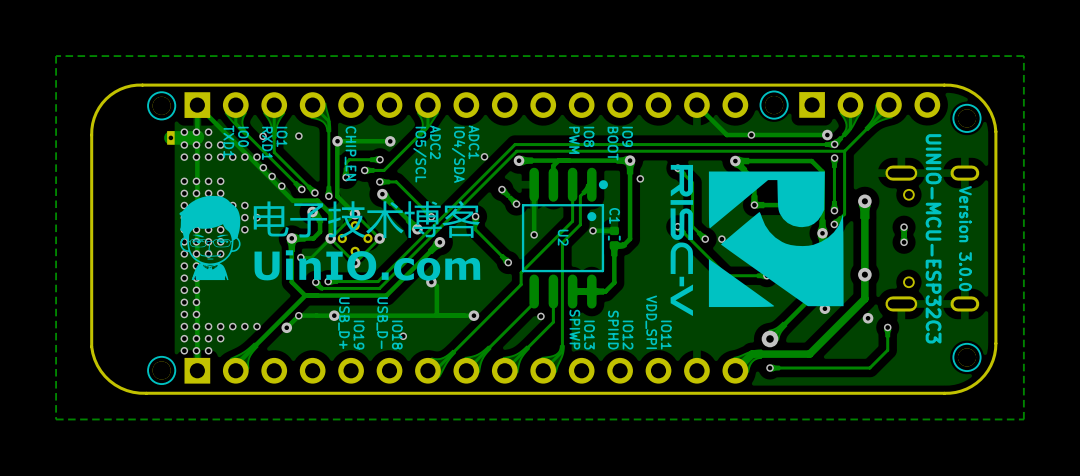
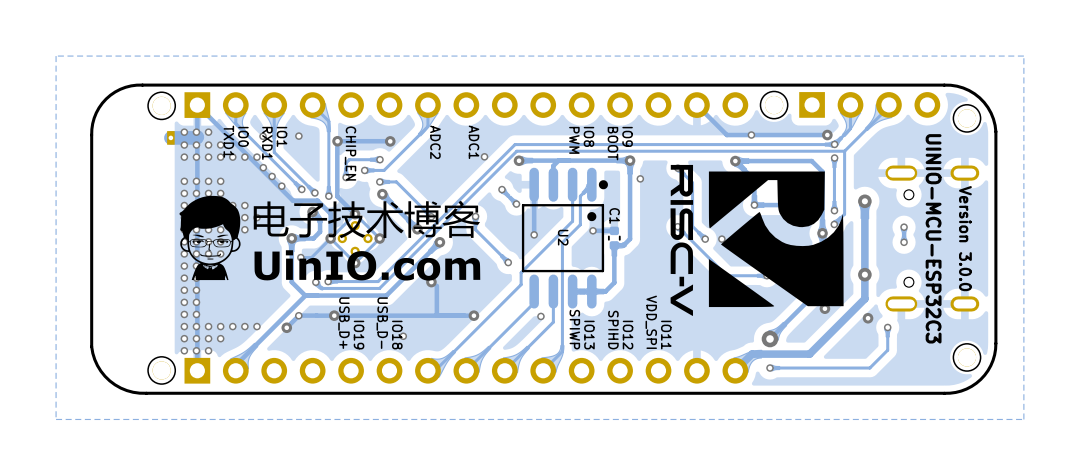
text: IO5/SCL (419, 154) -> none
text: IO4/SDA (458, 154) -> none

